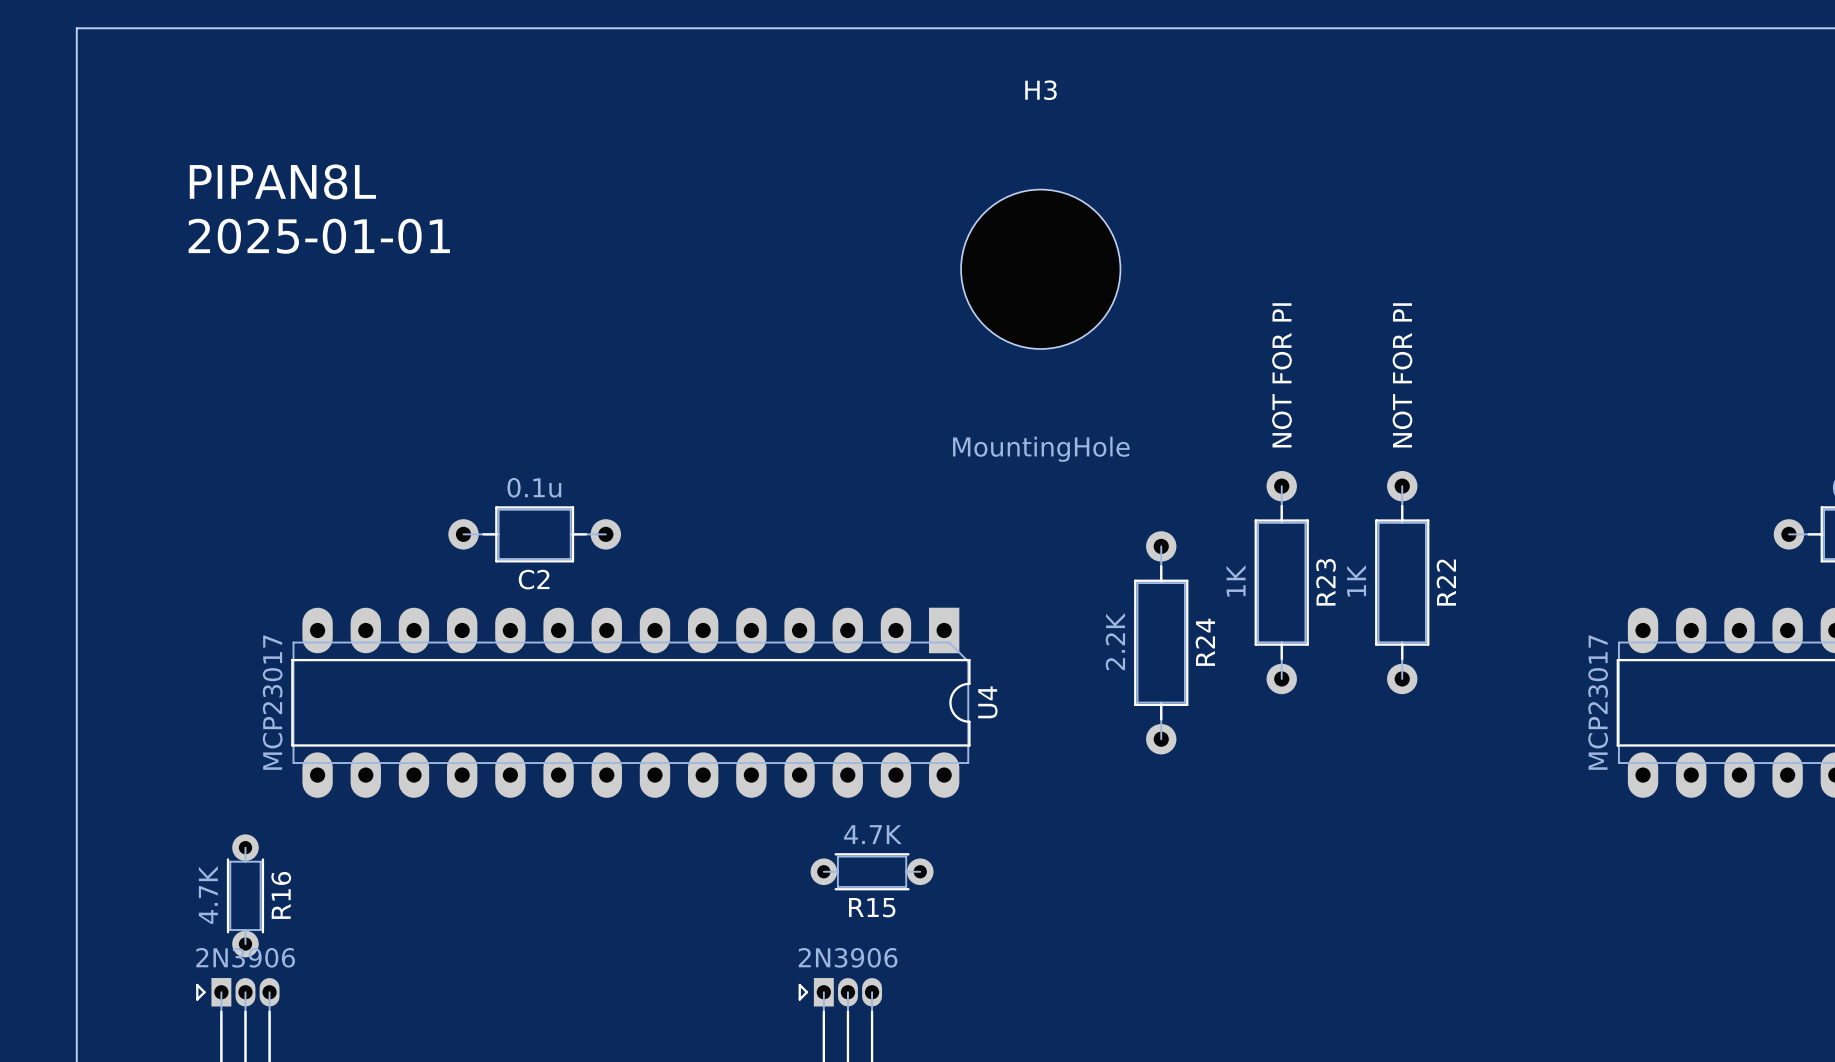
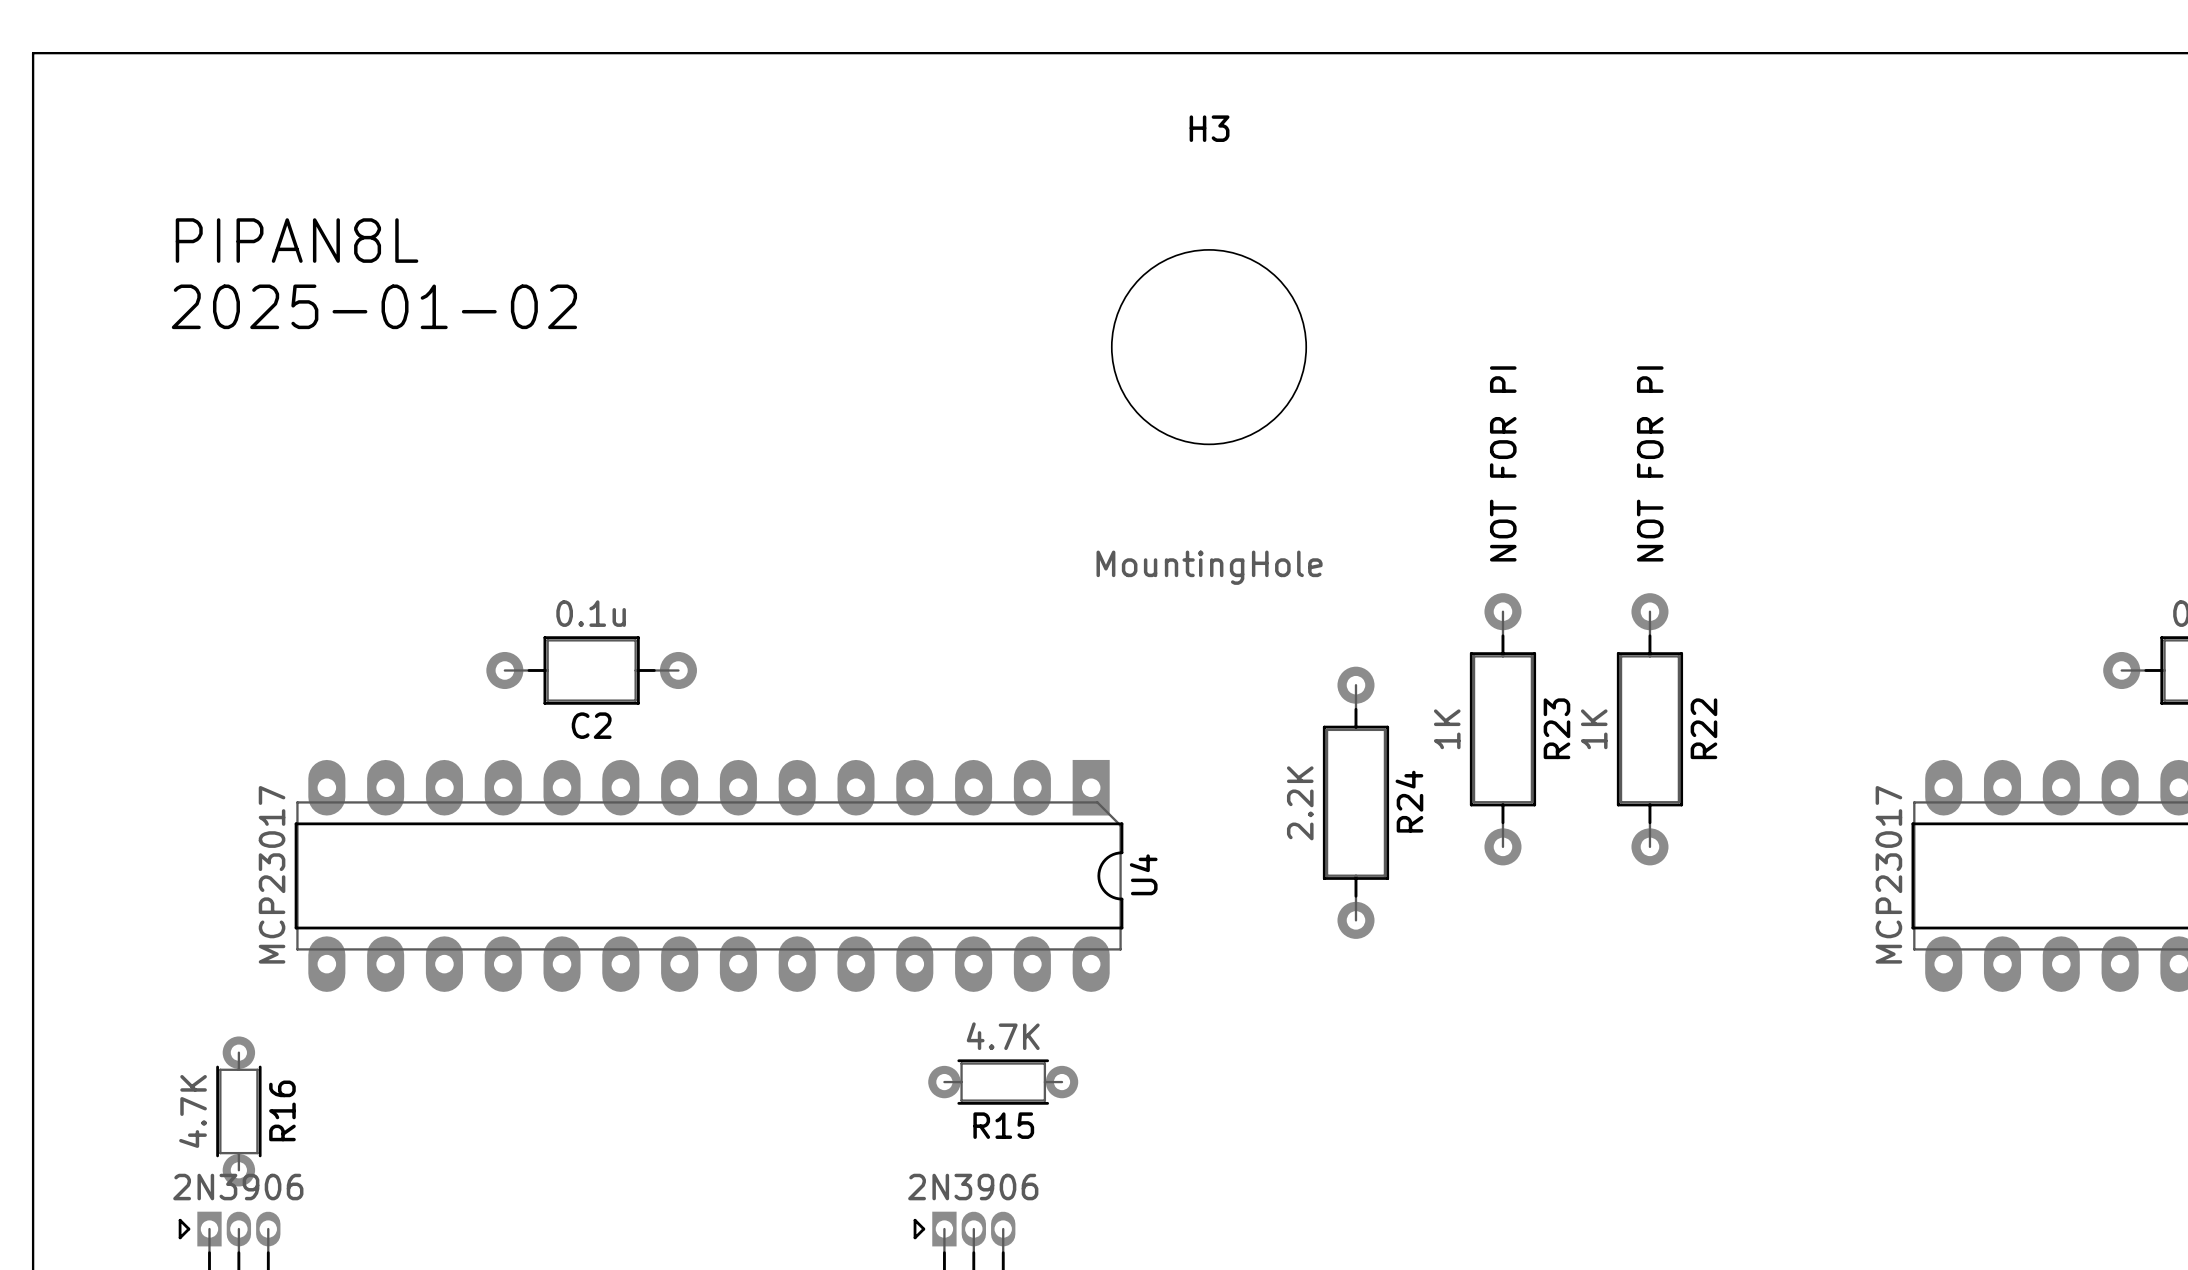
text: 2025-01-01 (319, 236) -> 2025-01-02 (374, 306)

